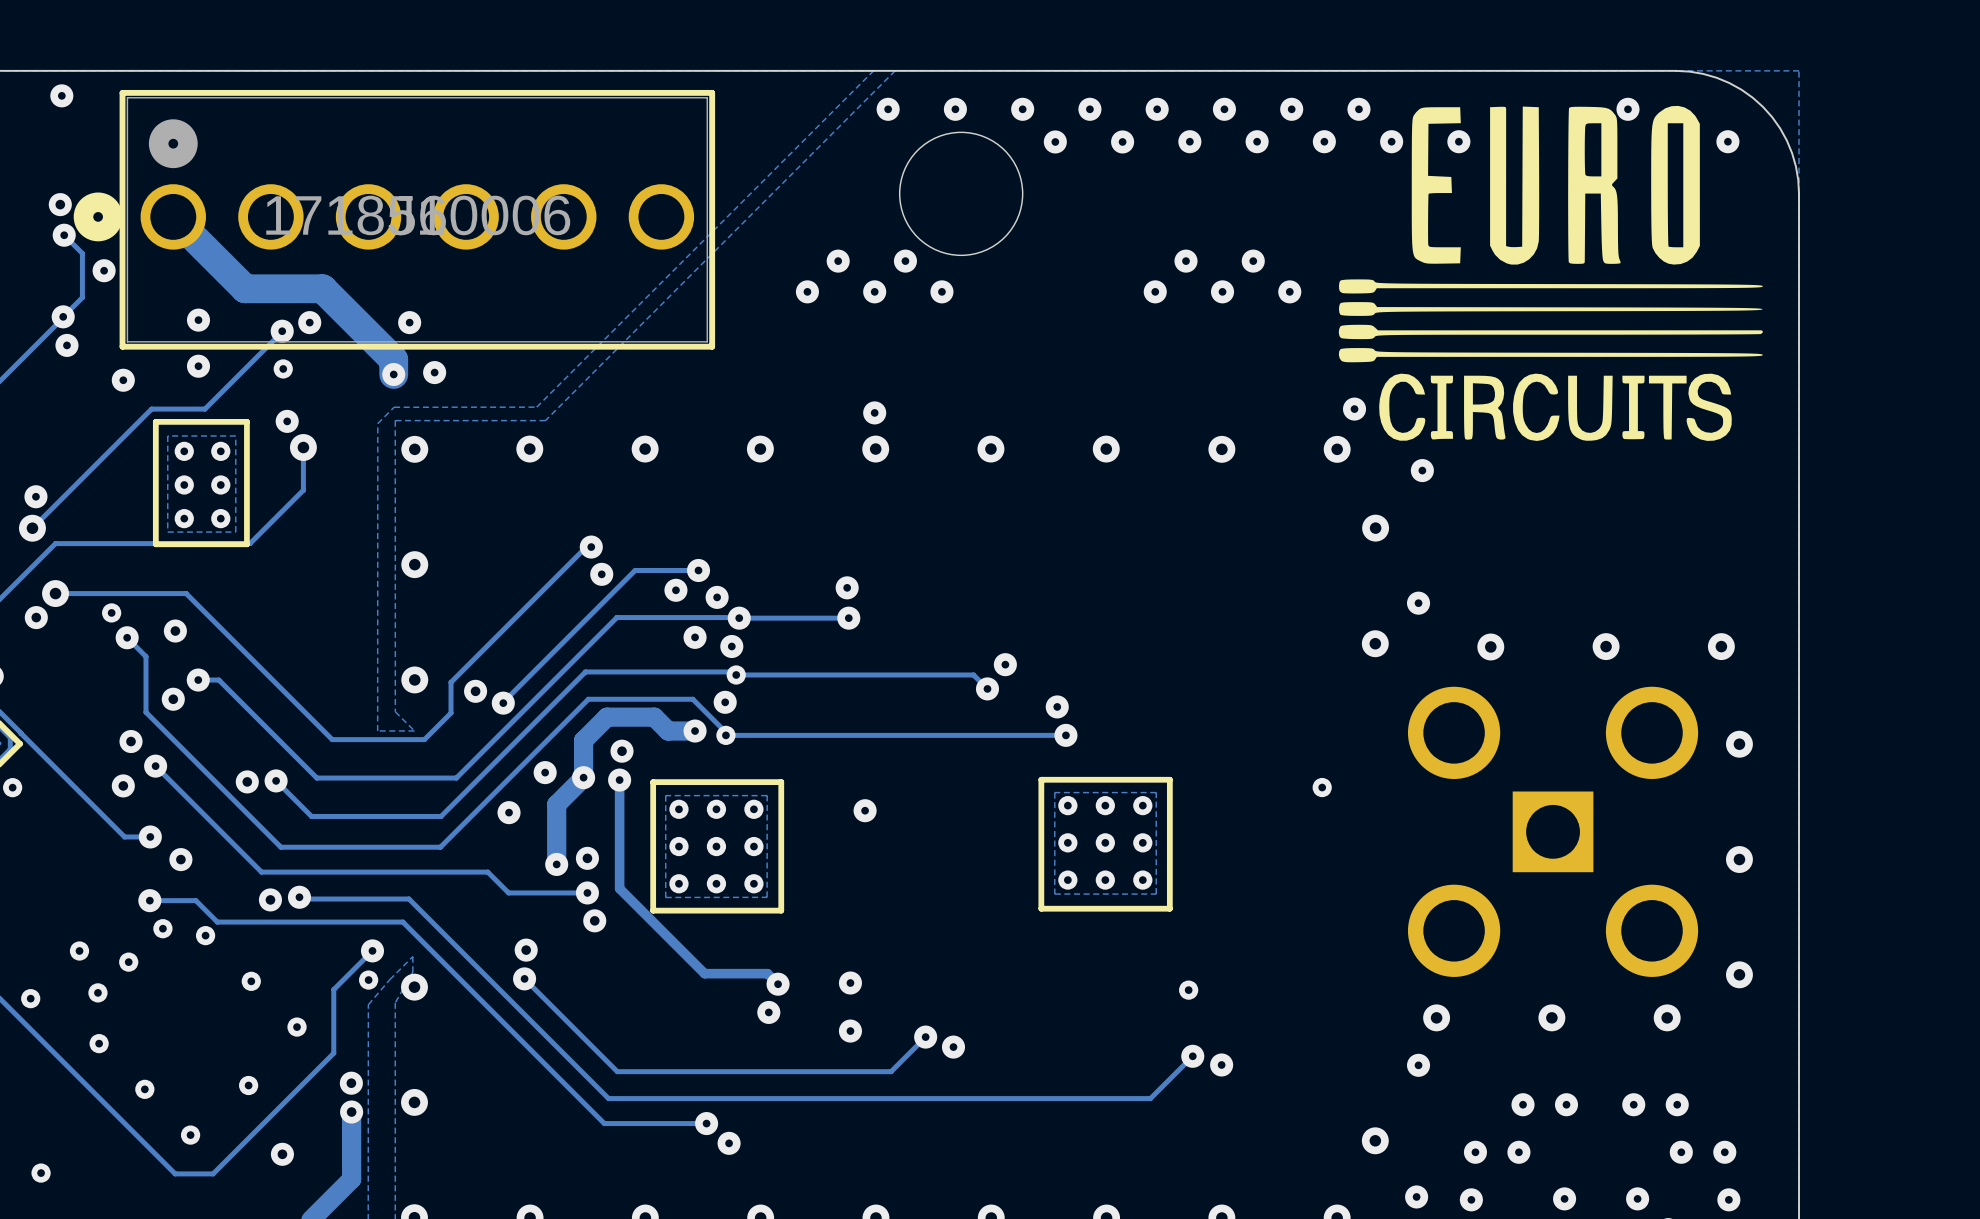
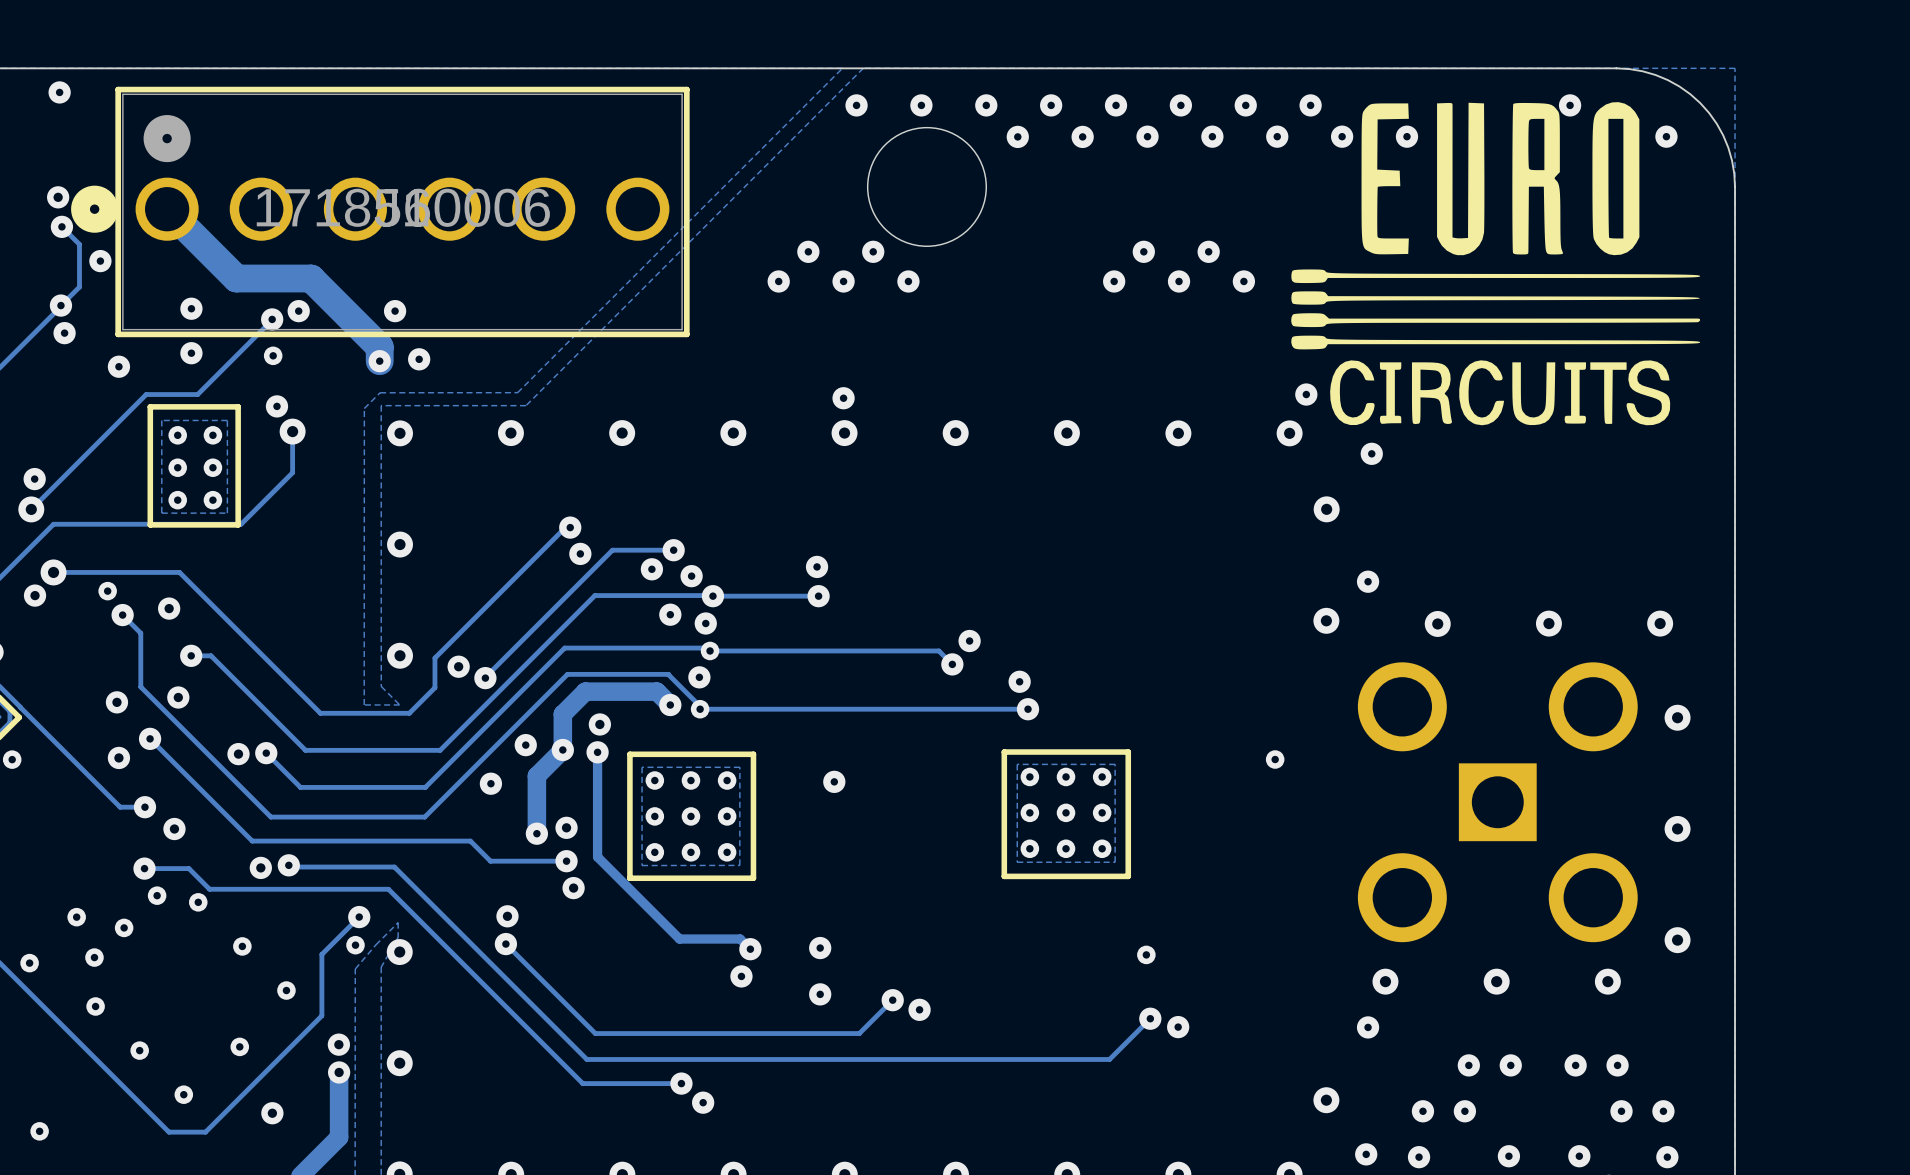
via position: (173, 699) -> (178, 697)
track: (654, 717) (668, 731) (695, 731) -> (631, 691) (656, 691) (670, 705)
via position: (131, 741) -> (116, 702)

